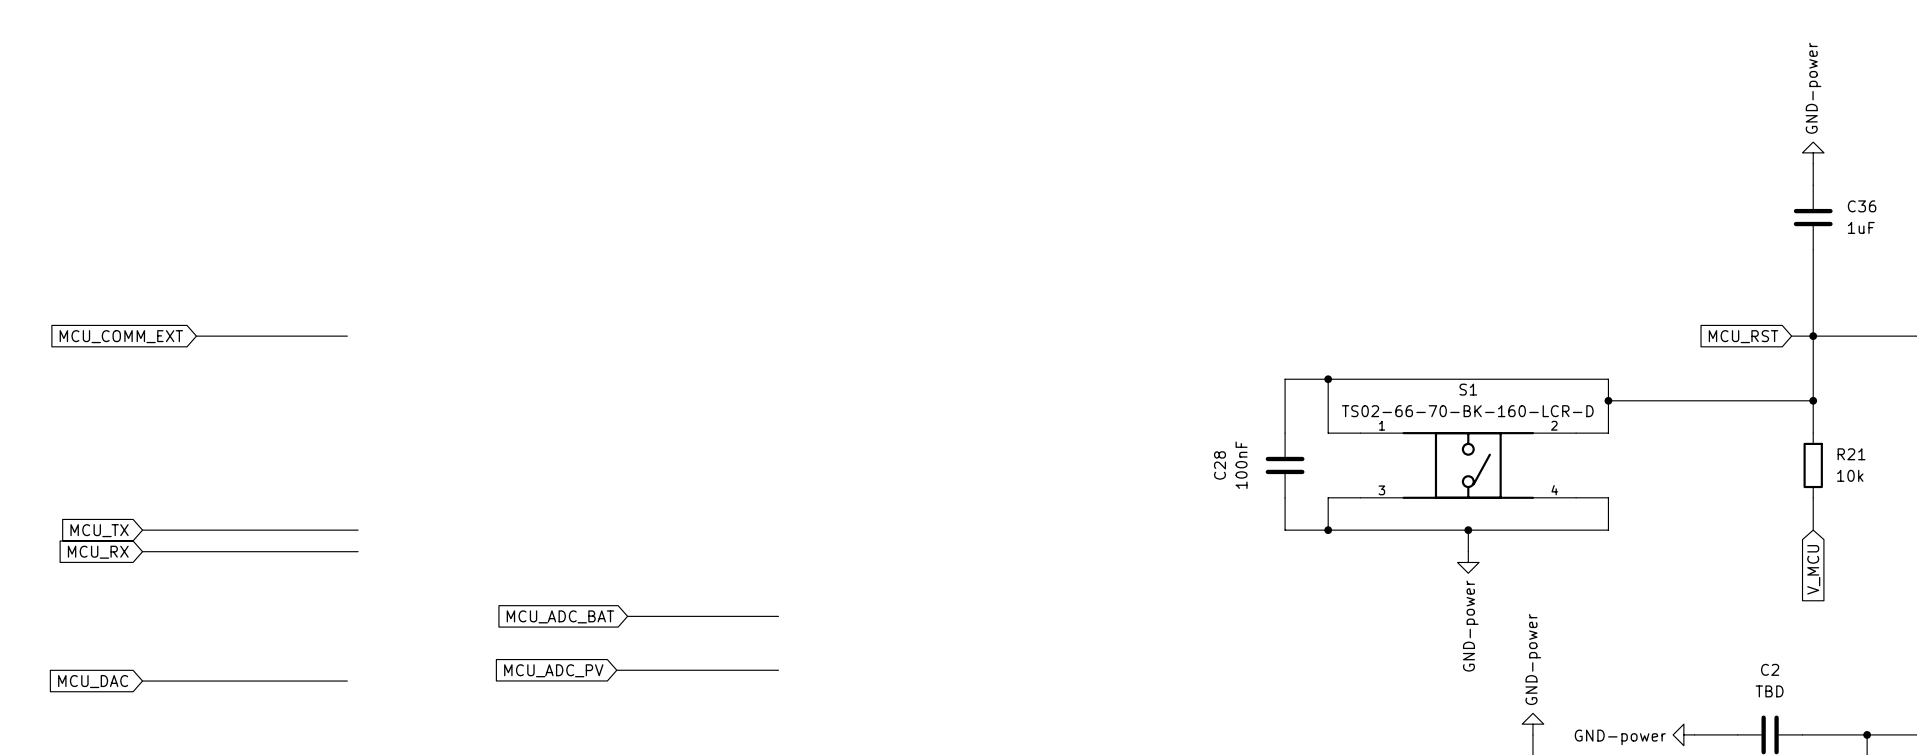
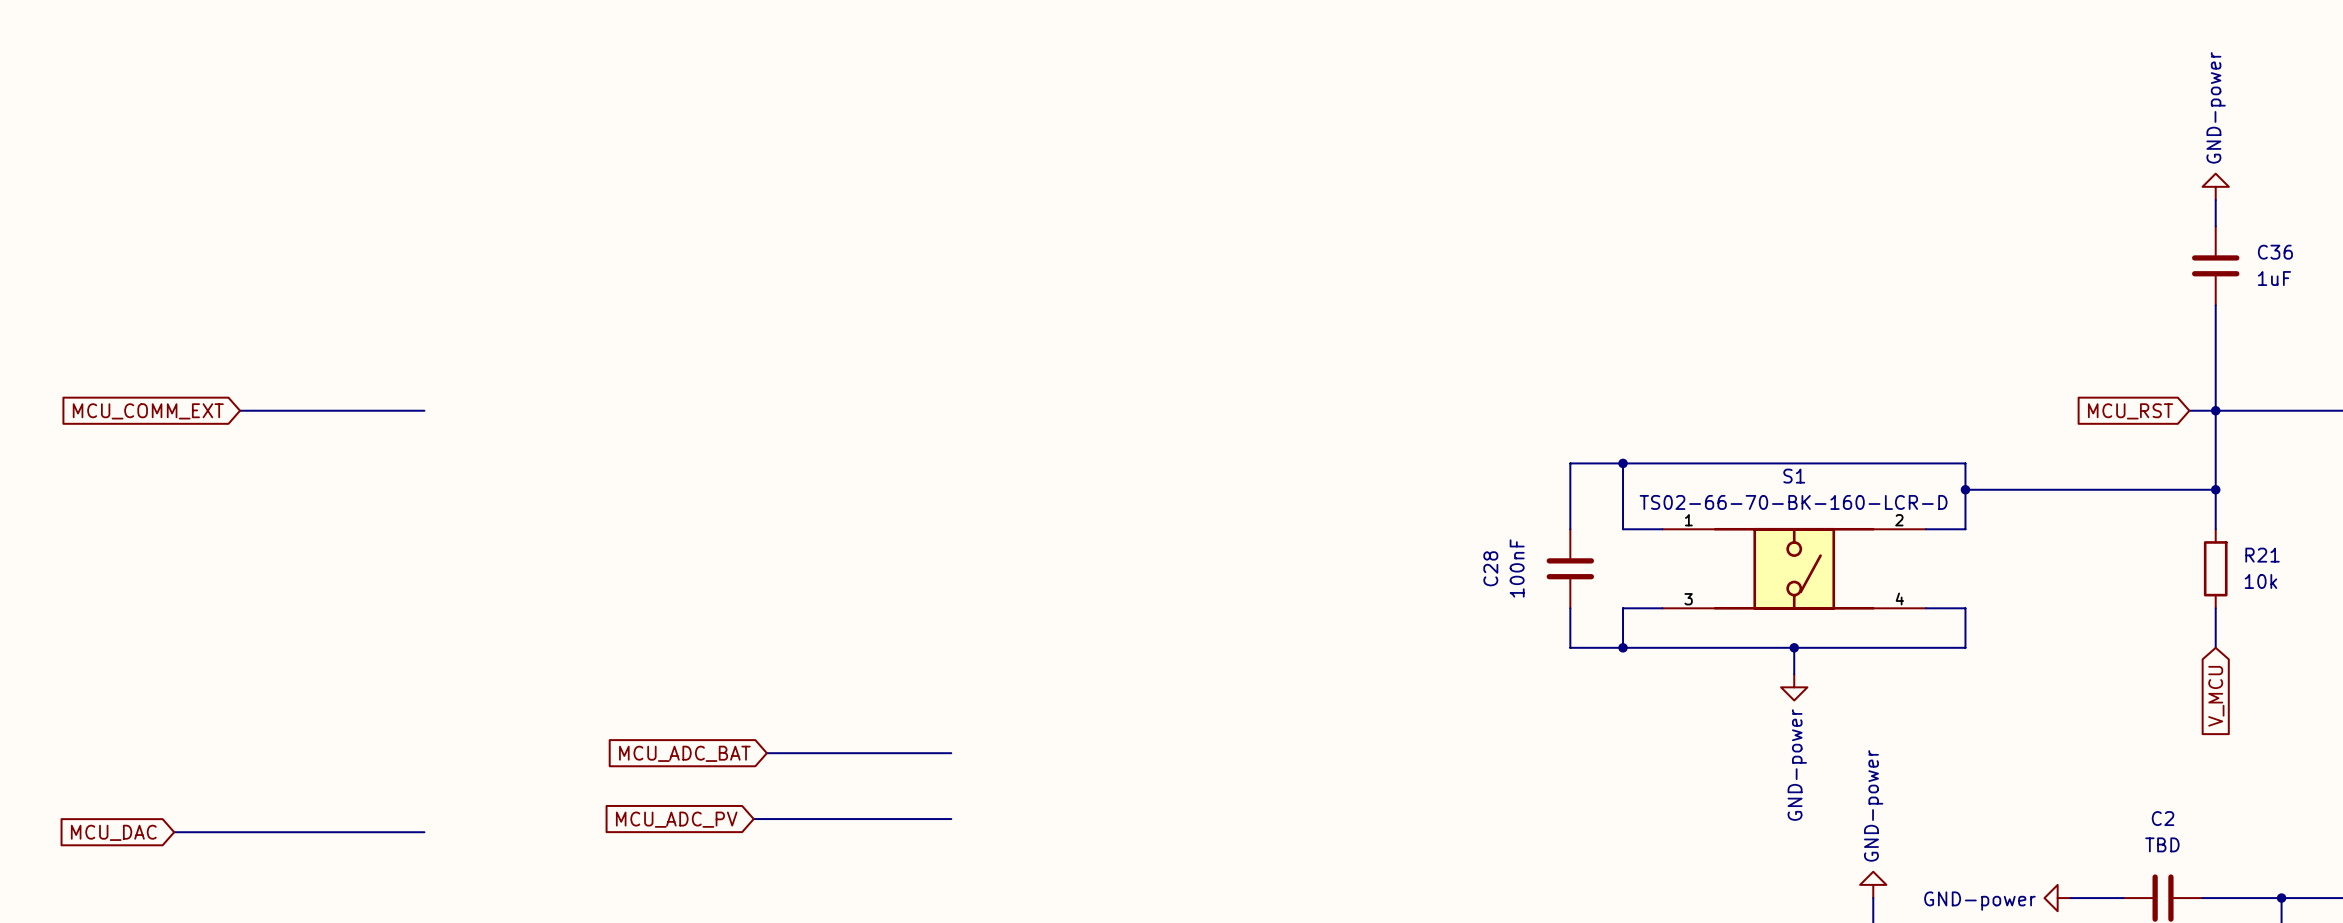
global label: MCU_TX (99, 530) -> none
wire: (142, 530) (358, 530) -> none
wire: (142, 551) (358, 551) -> none
global label: MCU_RX (98, 552) -> none

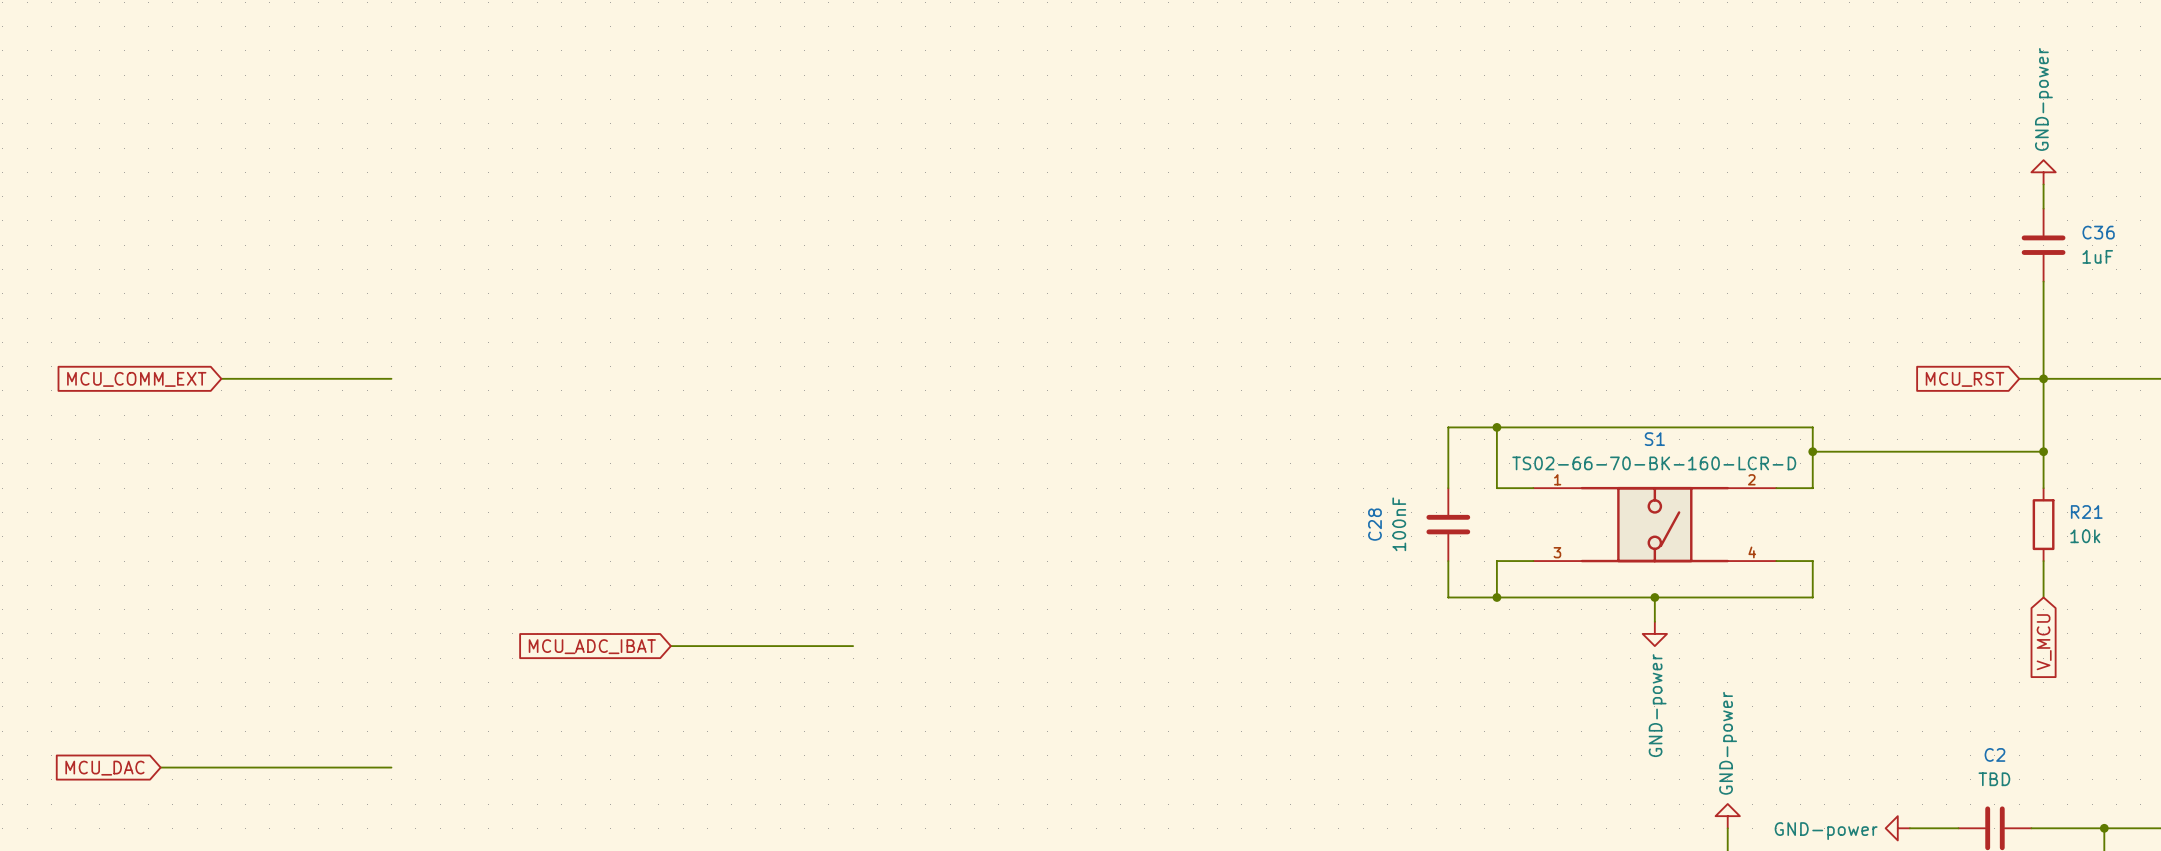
global label: none -> MCU_ADC_IBAT (592, 646)
global label: MCU_ADC_BAT (684, 753) -> none
wire: (766, 753) (951, 753) -> none
global label: MCU_ADC_PV (676, 819) -> none
wire: (753, 819) (951, 819) -> (670, 646) (853, 646)

